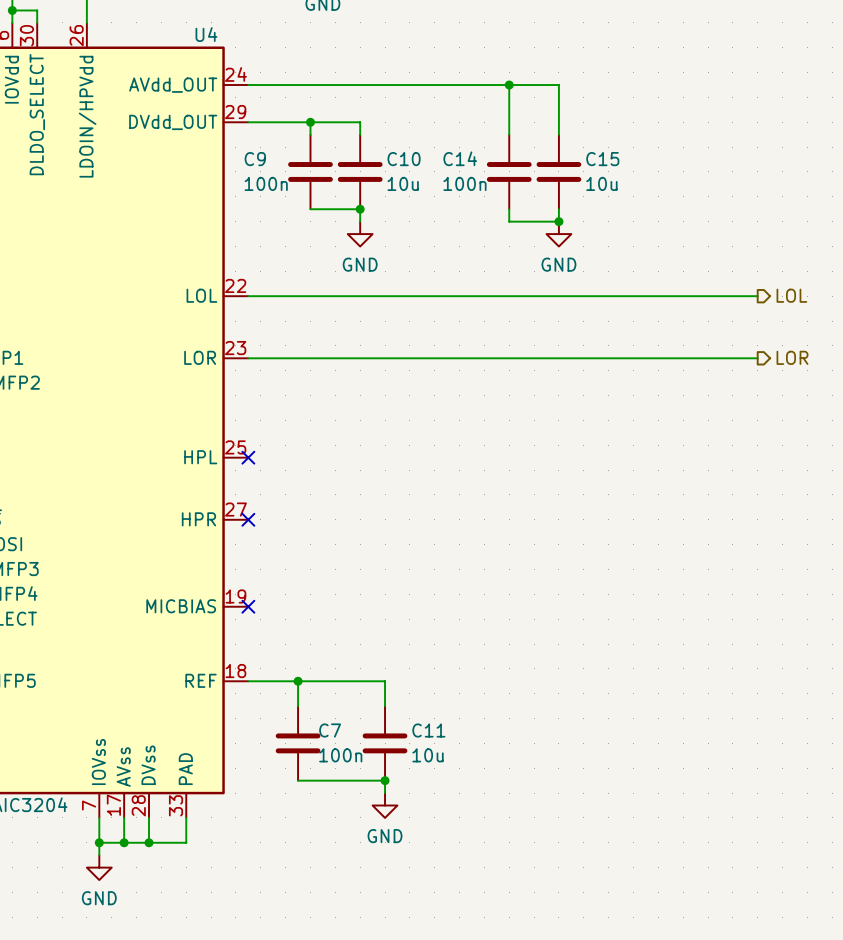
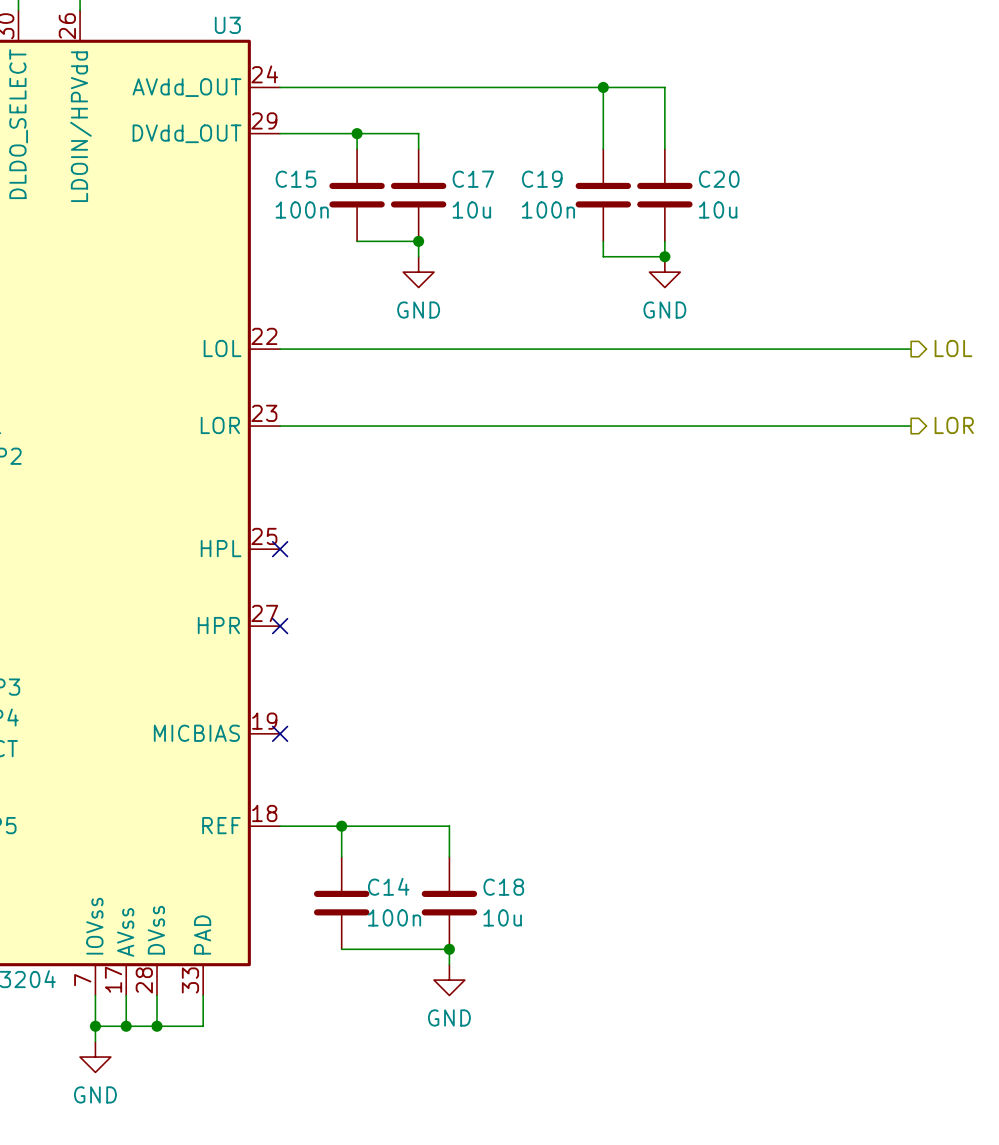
U4 name: U4 (206, 34) -> U3 (227, 25)
C14 name: C14 (460, 158) -> C19 (542, 179)
C9 name: C9 (255, 159) -> C15 (295, 179)
C10 name: C10 (404, 159) -> C17 (473, 179)
C15 name: C15 (602, 159) -> C20 (719, 179)
C7 name: C7 (330, 730) -> C14 (388, 886)
C11 name: C11 (428, 730) -> C18 (503, 887)

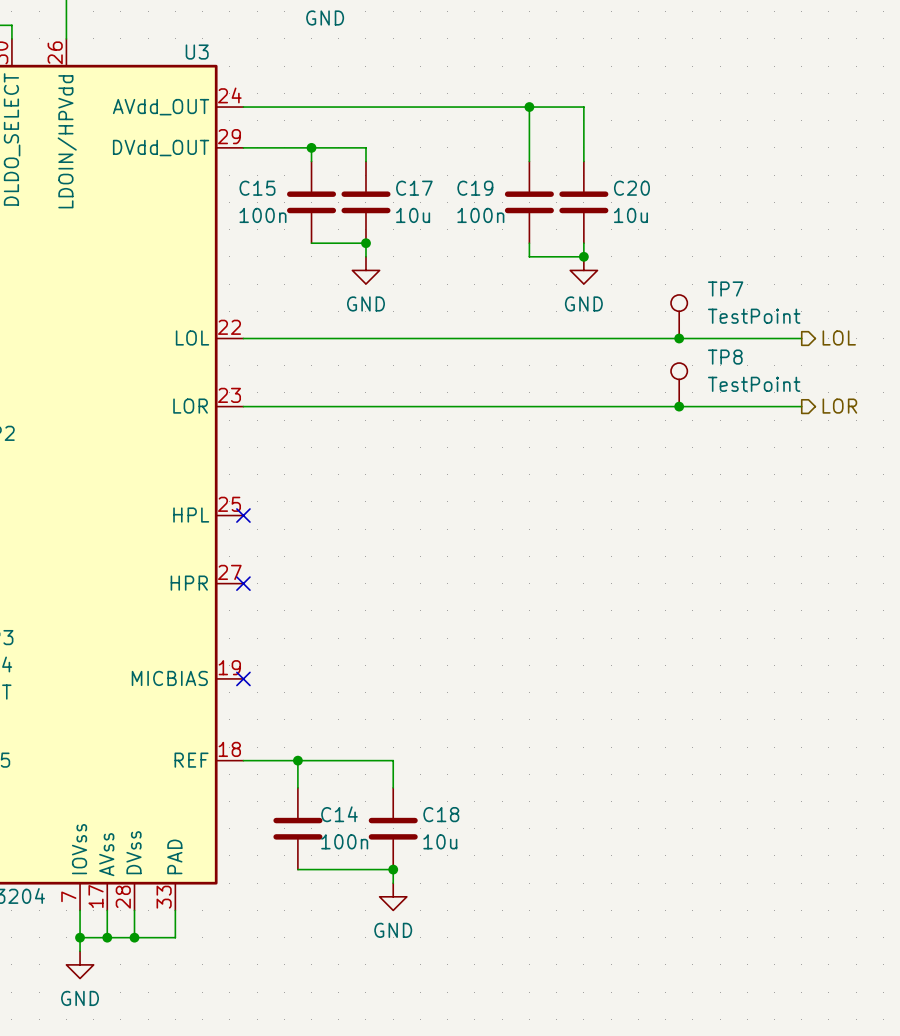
TP7: none -> TestPoint (679, 316)
junction: none -> (679, 338)
TP8: none -> TestPoint (679, 384)
junction: none -> (679, 406)

